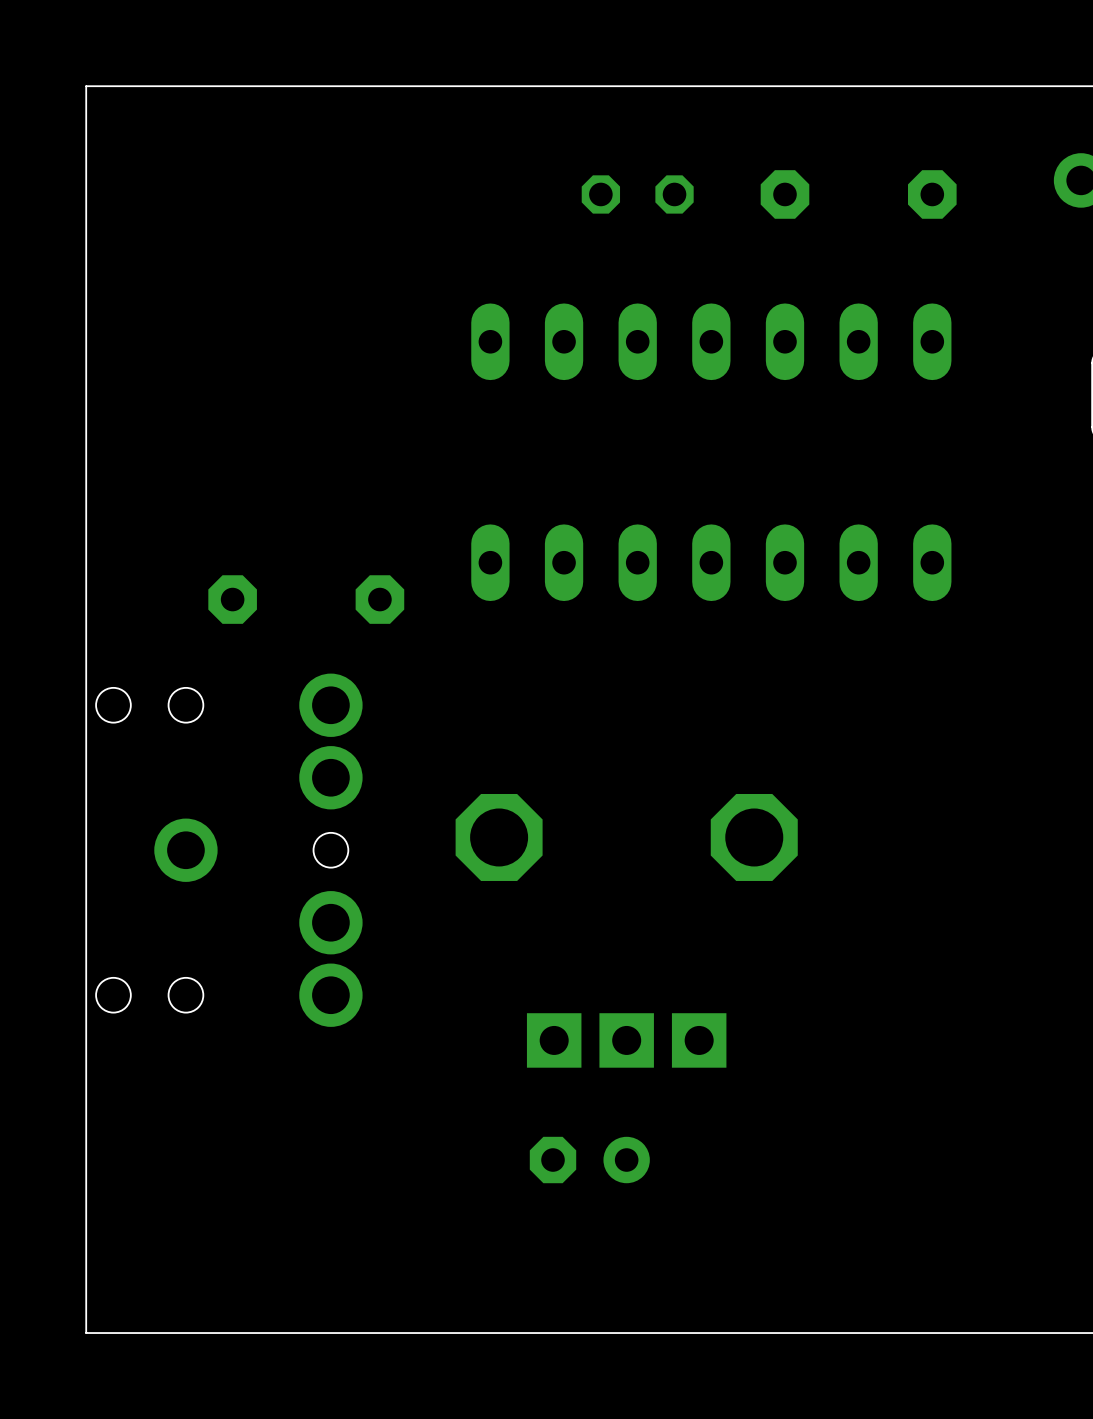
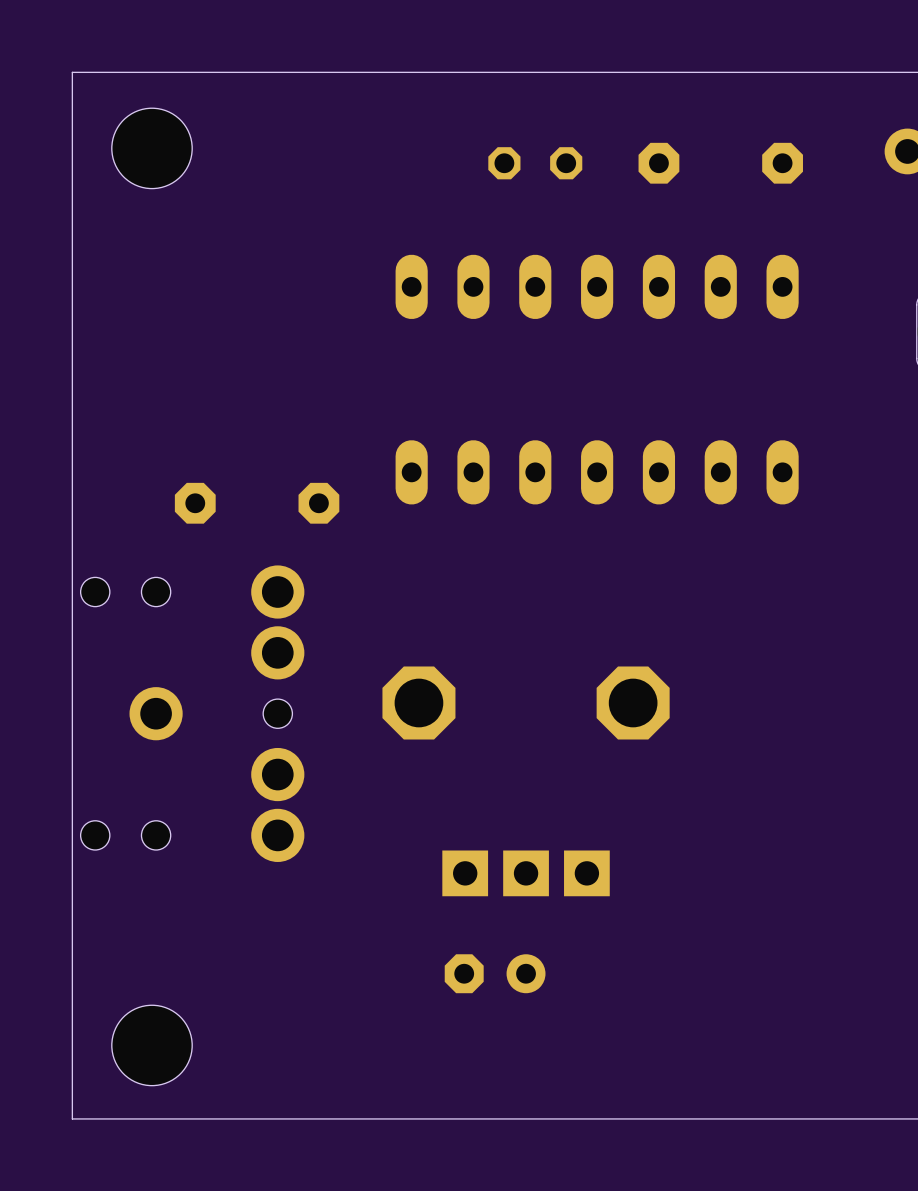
part: none -> (152, 148)
part: none -> (152, 1045)

